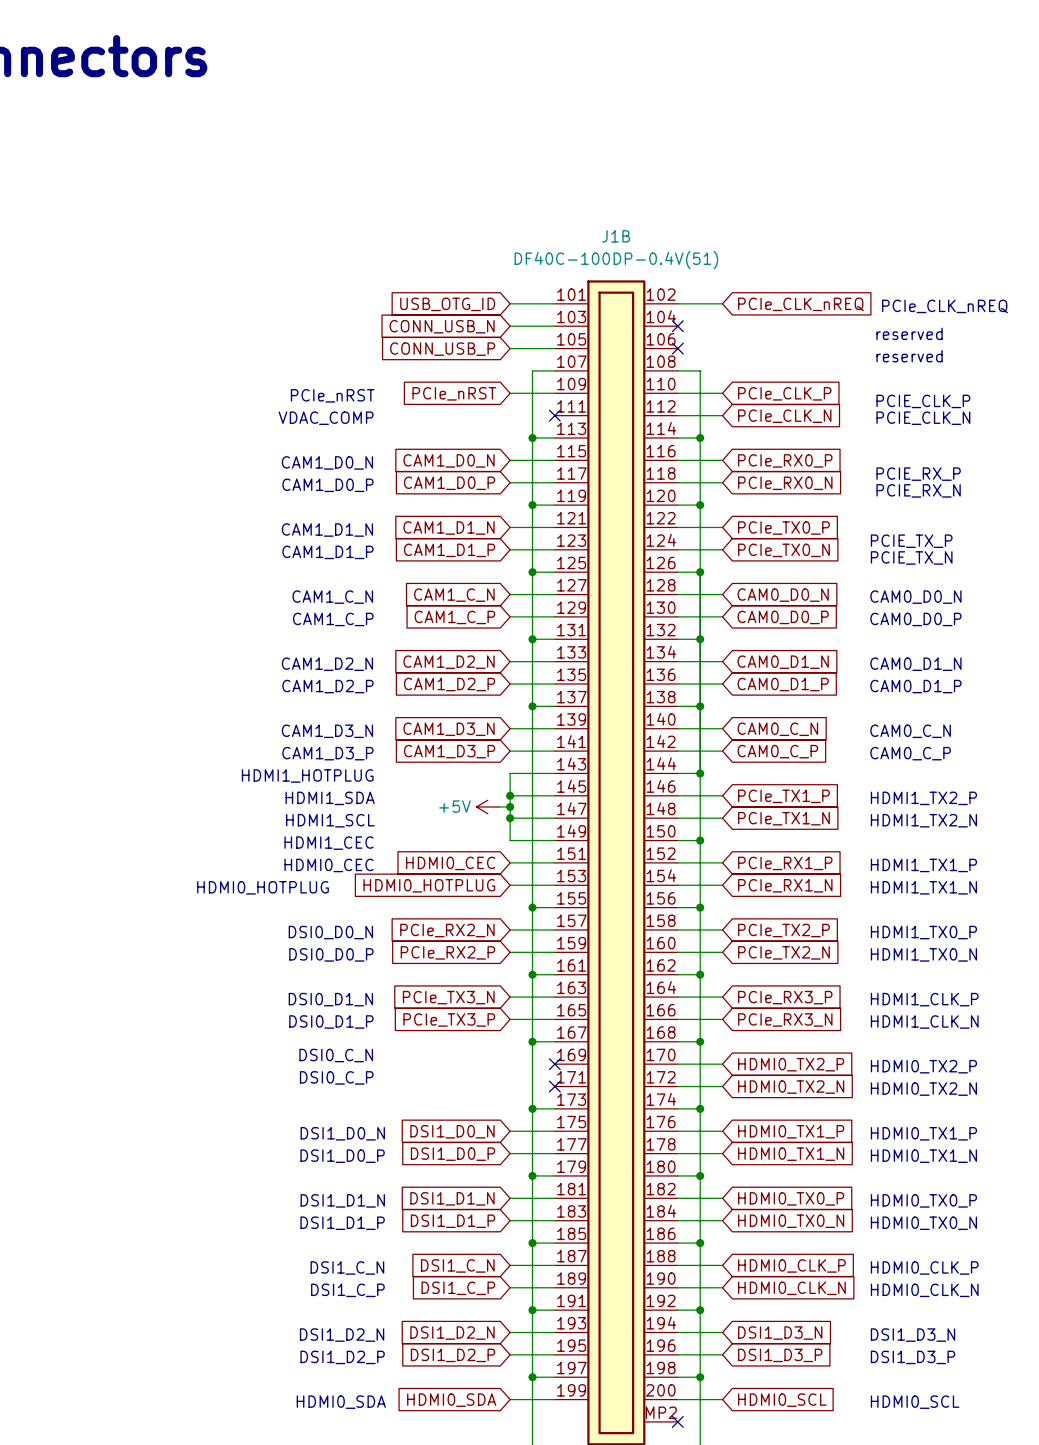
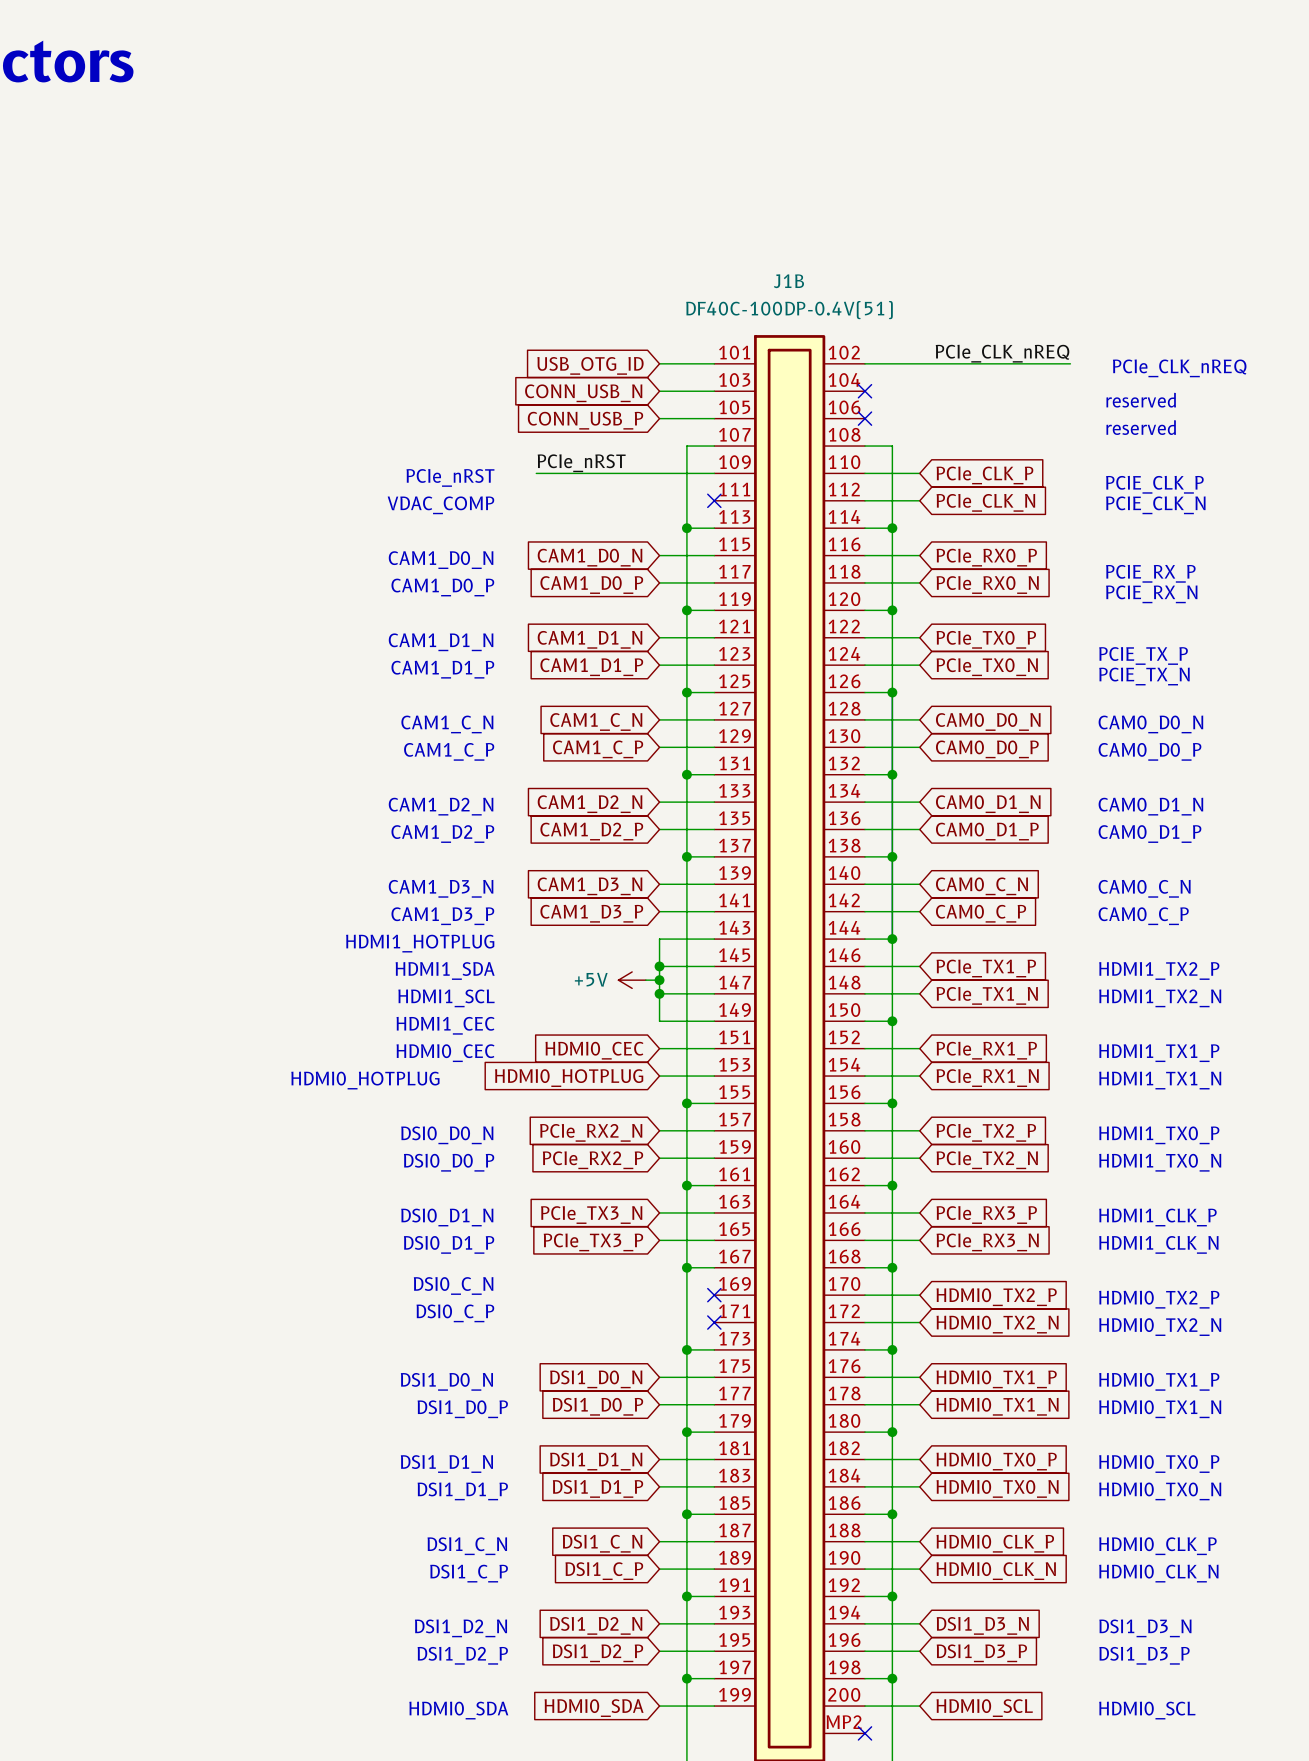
label: none -> PCIe_CLK_nREQ (1002, 353)
wire: none -> (919, 363) (1070, 363)
global label: PCIe_CLK_nREQ (800, 304) -> none
label: none -> PCIe_nRST (581, 463)
wire: none -> (536, 473) (659, 473)
global label: PCIe_nRST (454, 393) -> none

